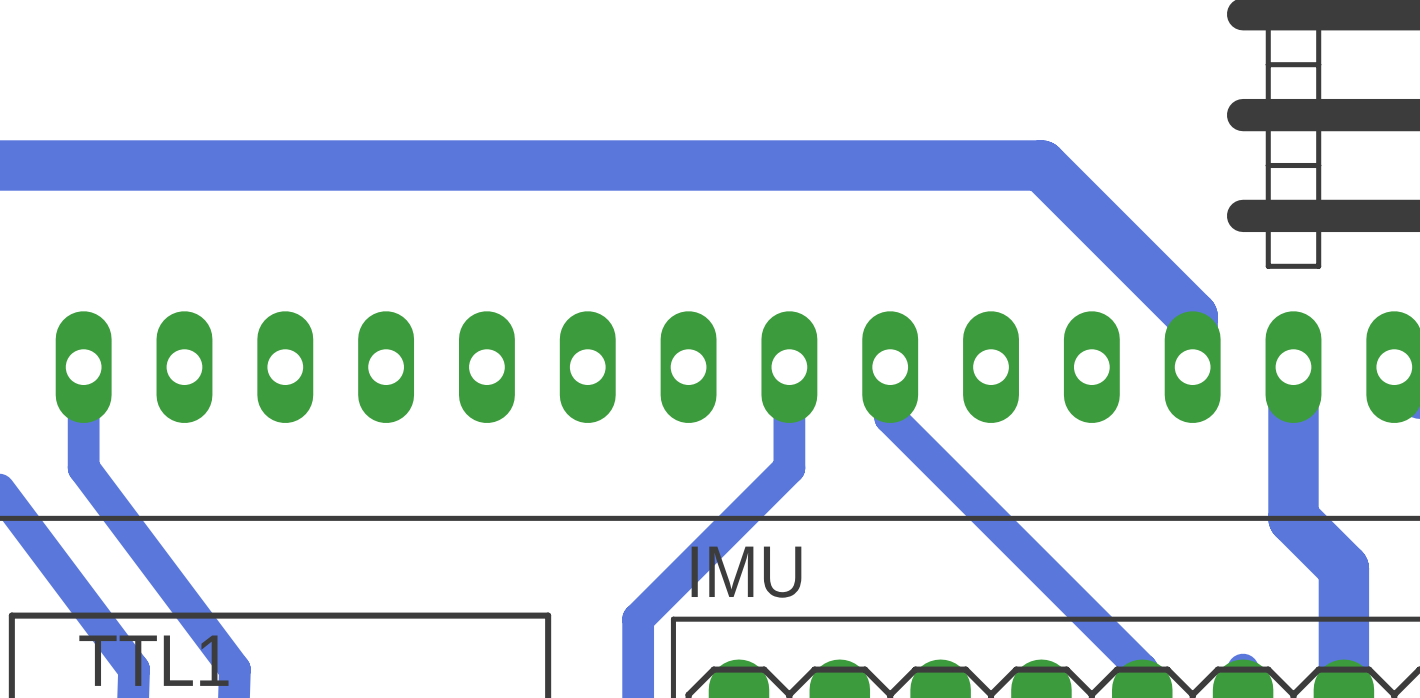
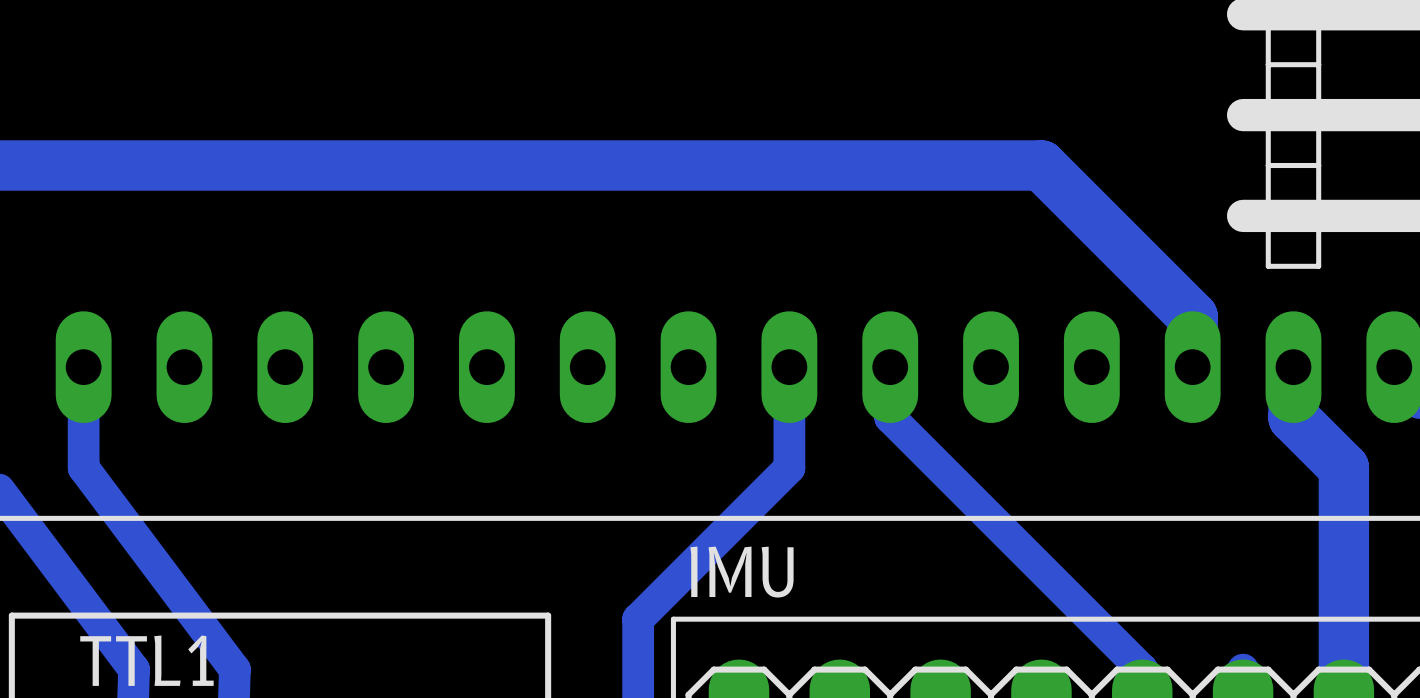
bottom track: (1293, 417) (1293, 518) (1343, 568) -> (1293, 417) (1343, 467) (1343, 568)

